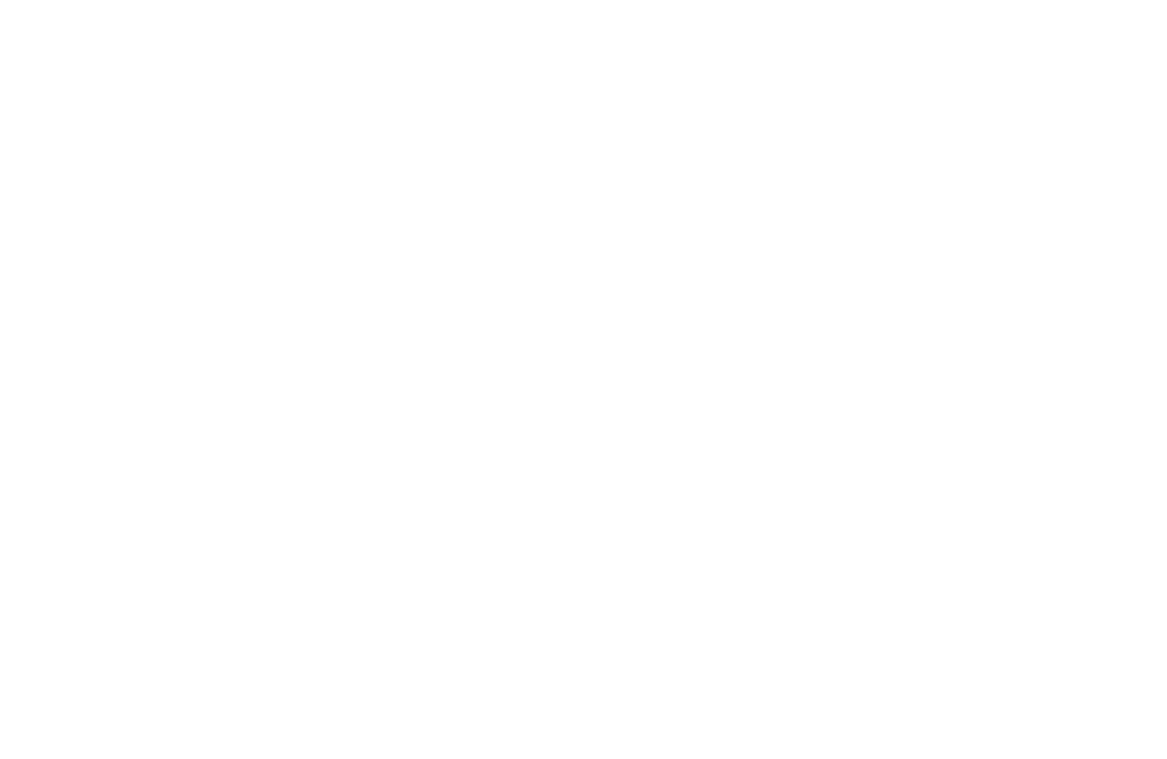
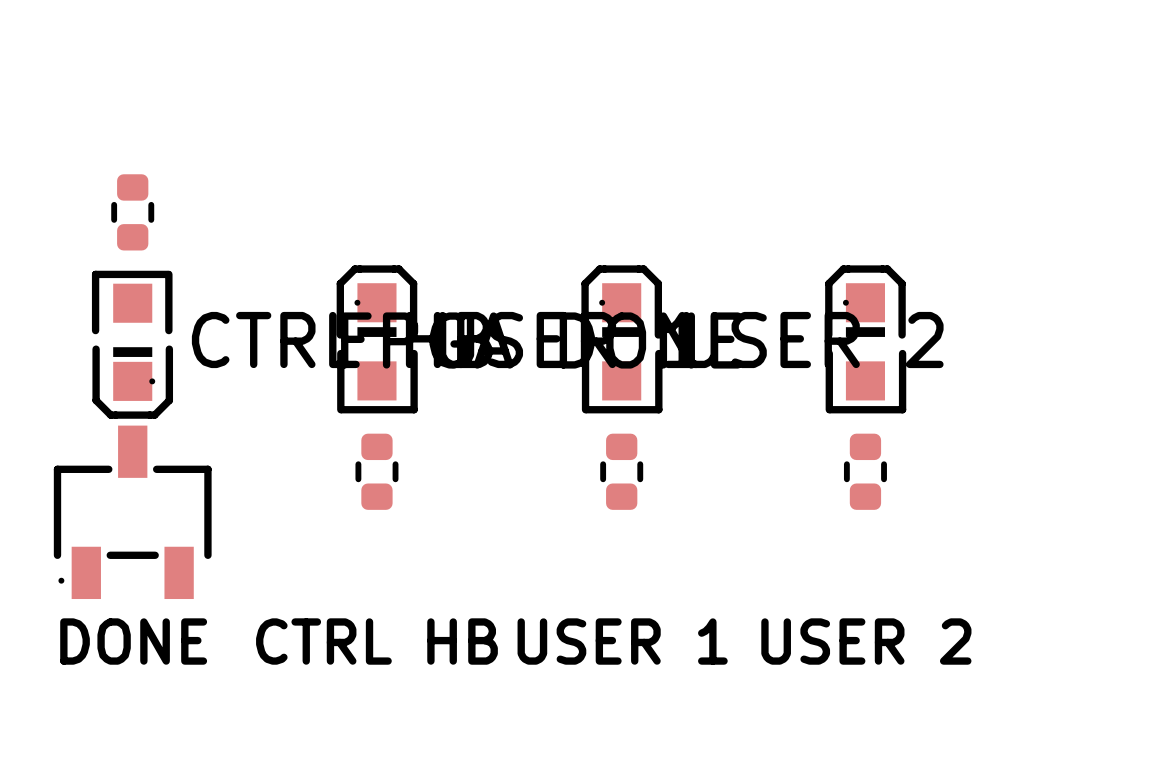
part: none -> (132, 212)
part: none -> (377, 339)
part: none -> (621, 339)
part: none -> (865, 339)
part: none -> (132, 344)
part: none -> (376, 471)
part: none -> (621, 471)
part: none -> (865, 471)
part: none -> (132, 512)

